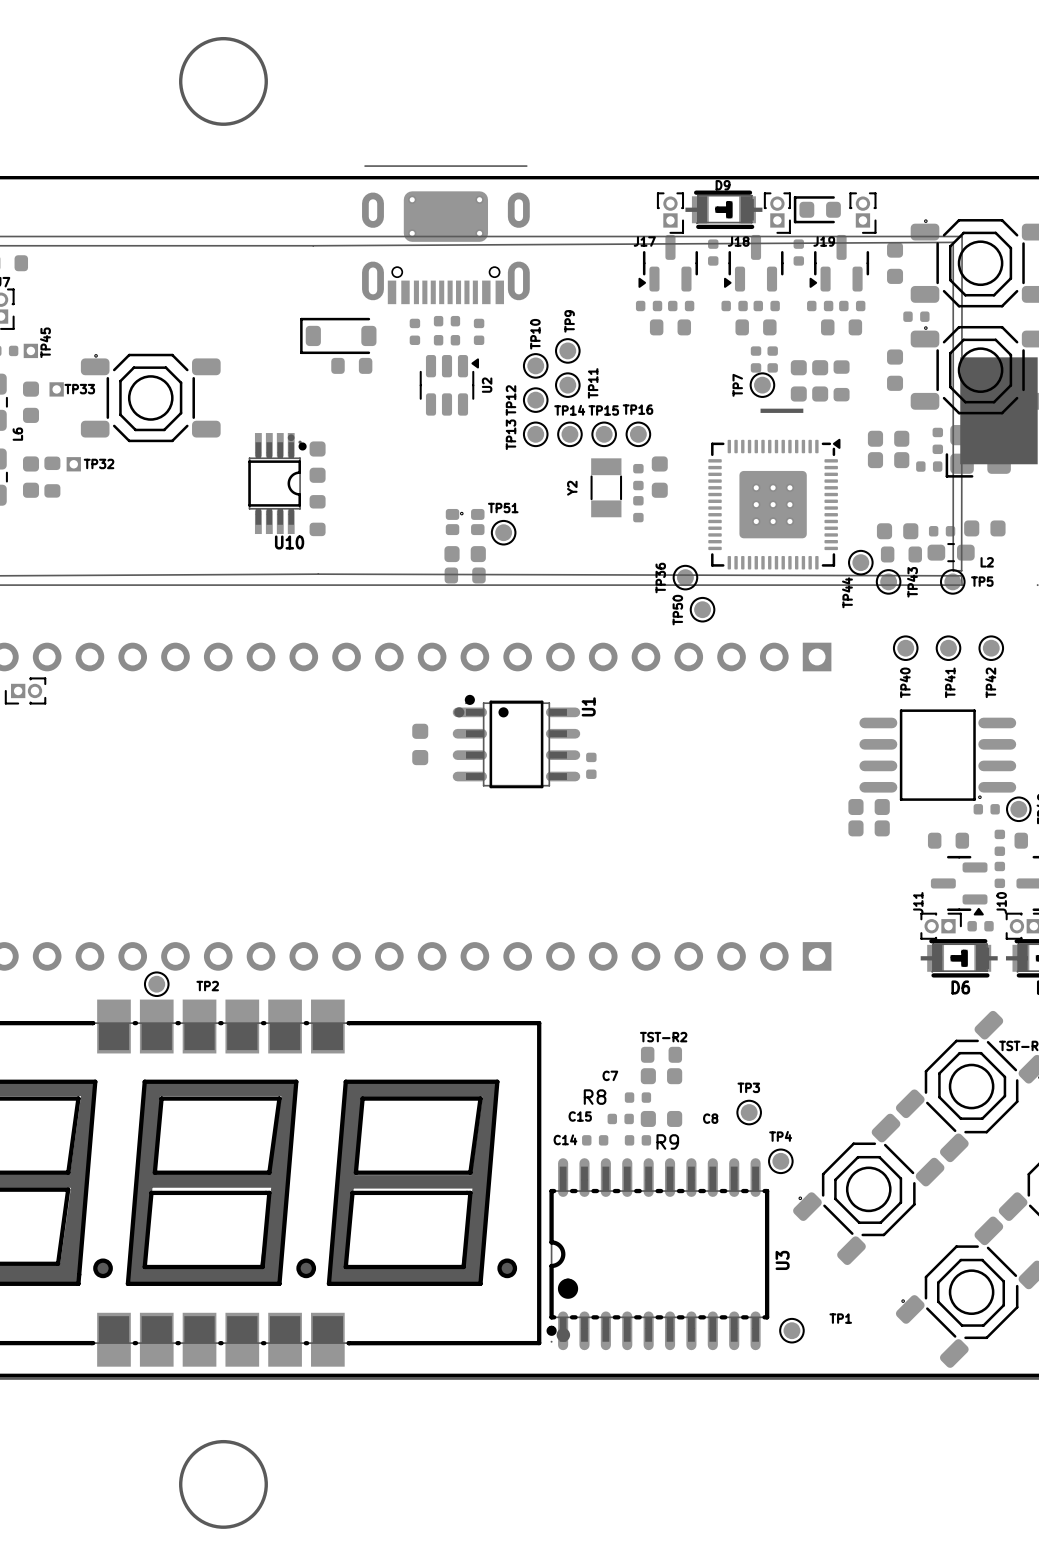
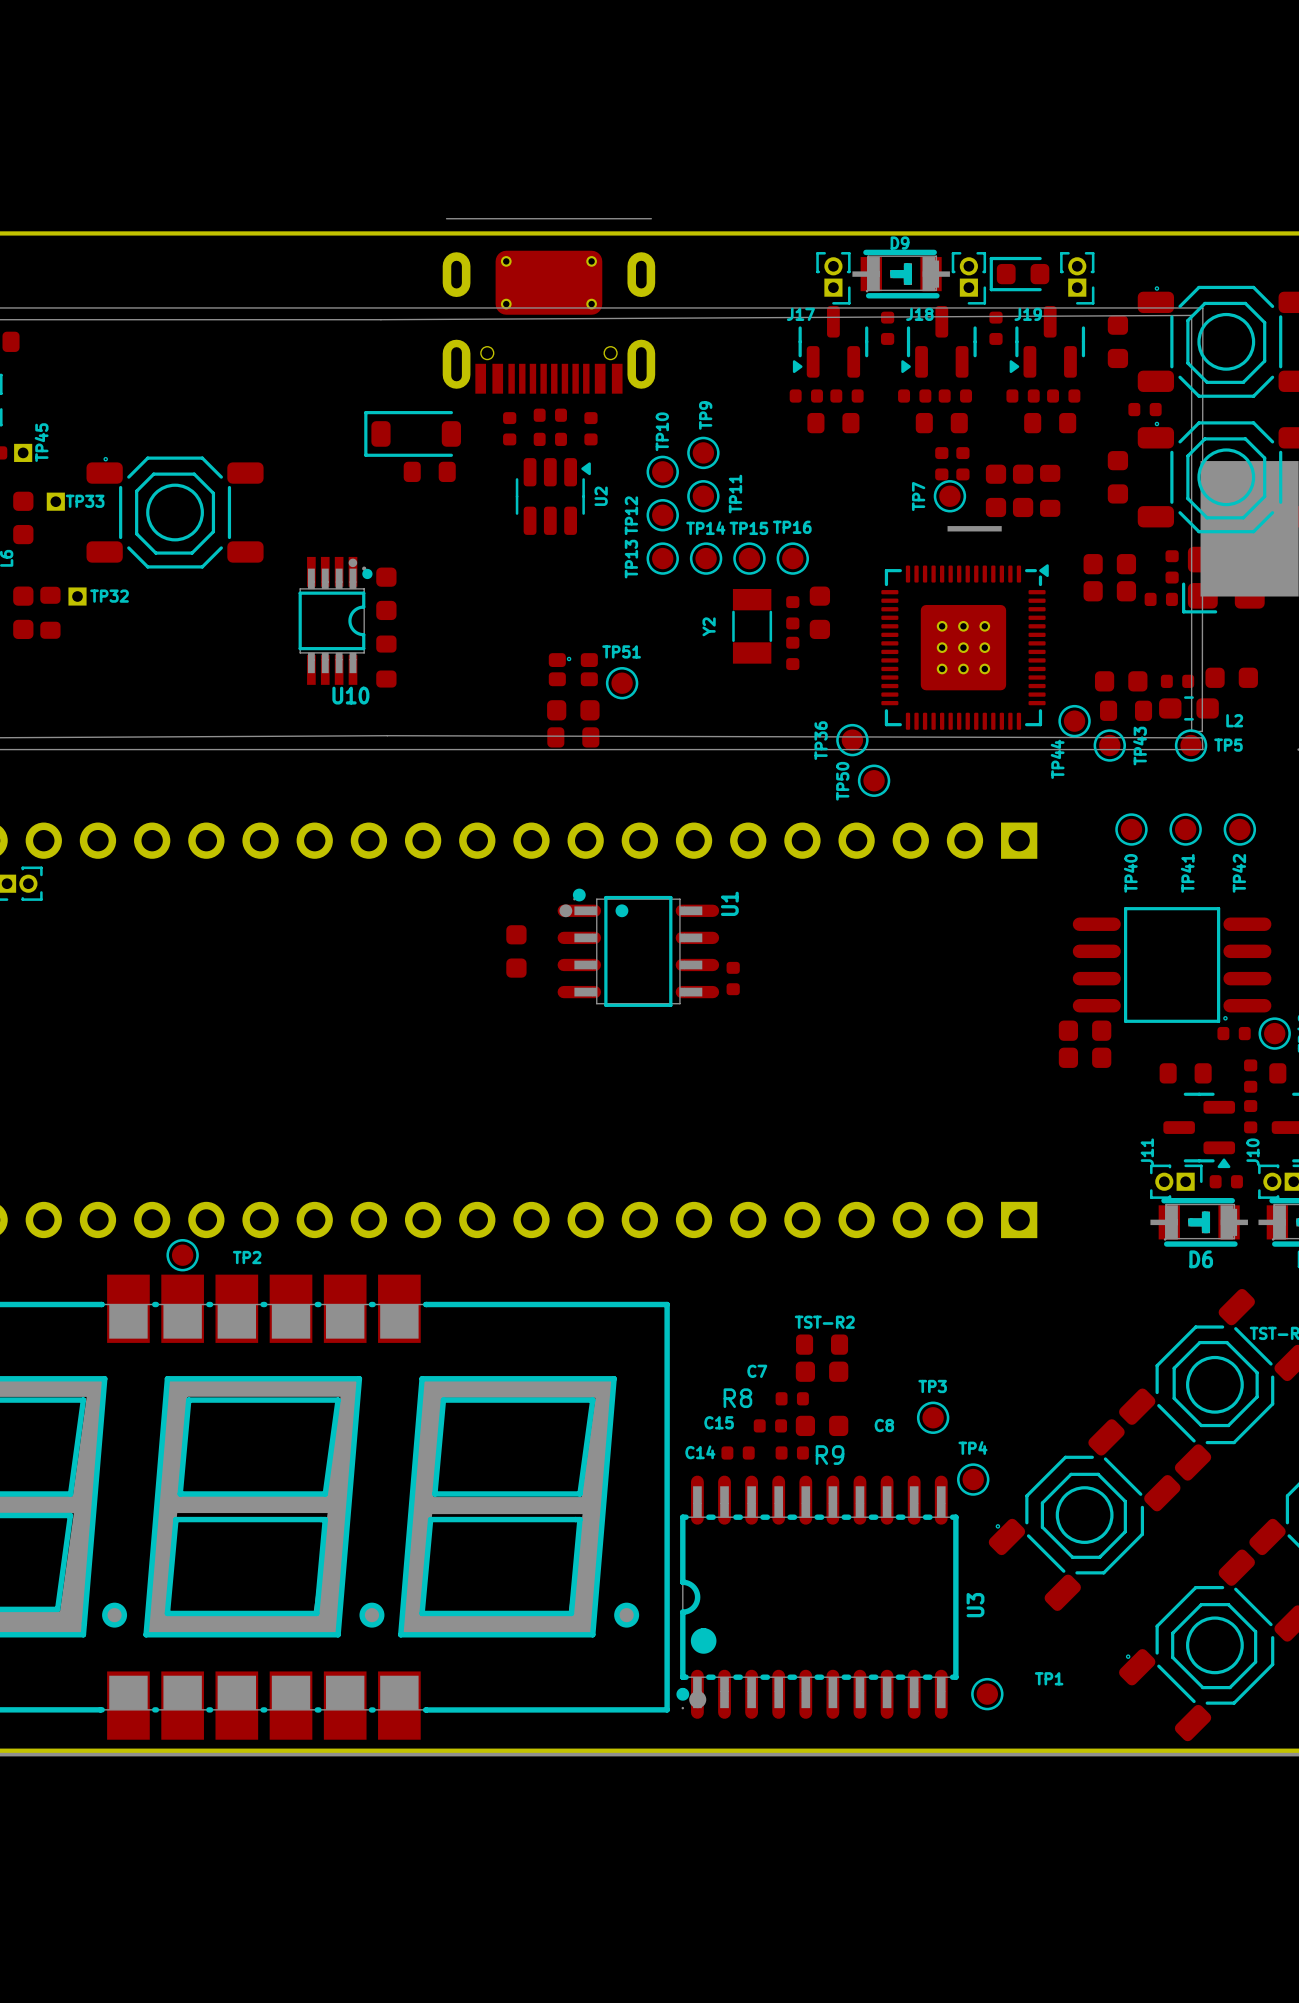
drawing: [179, 36, 268, 126] -> none
drawing: [179, 1439, 268, 1529] -> none

